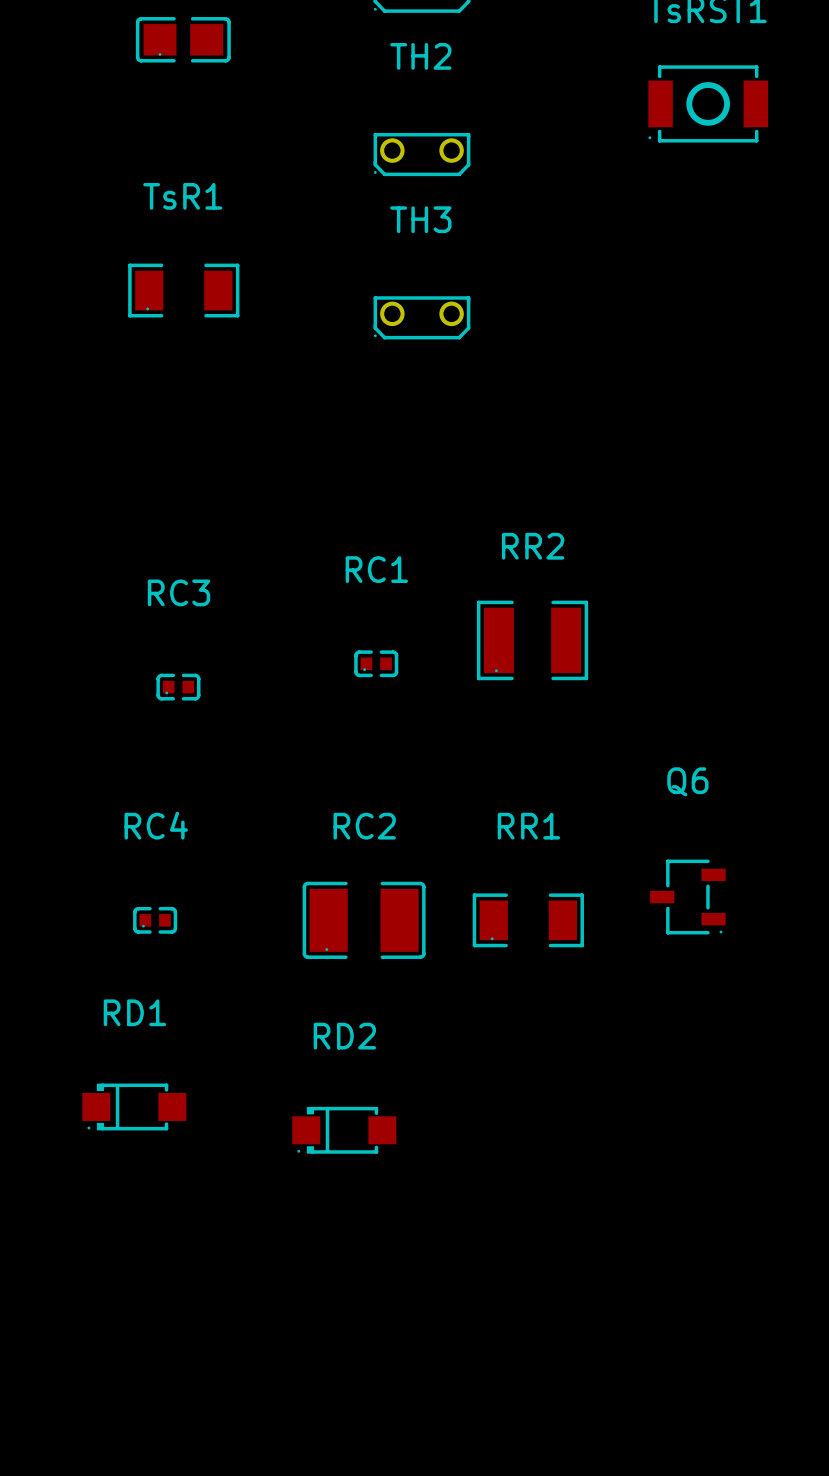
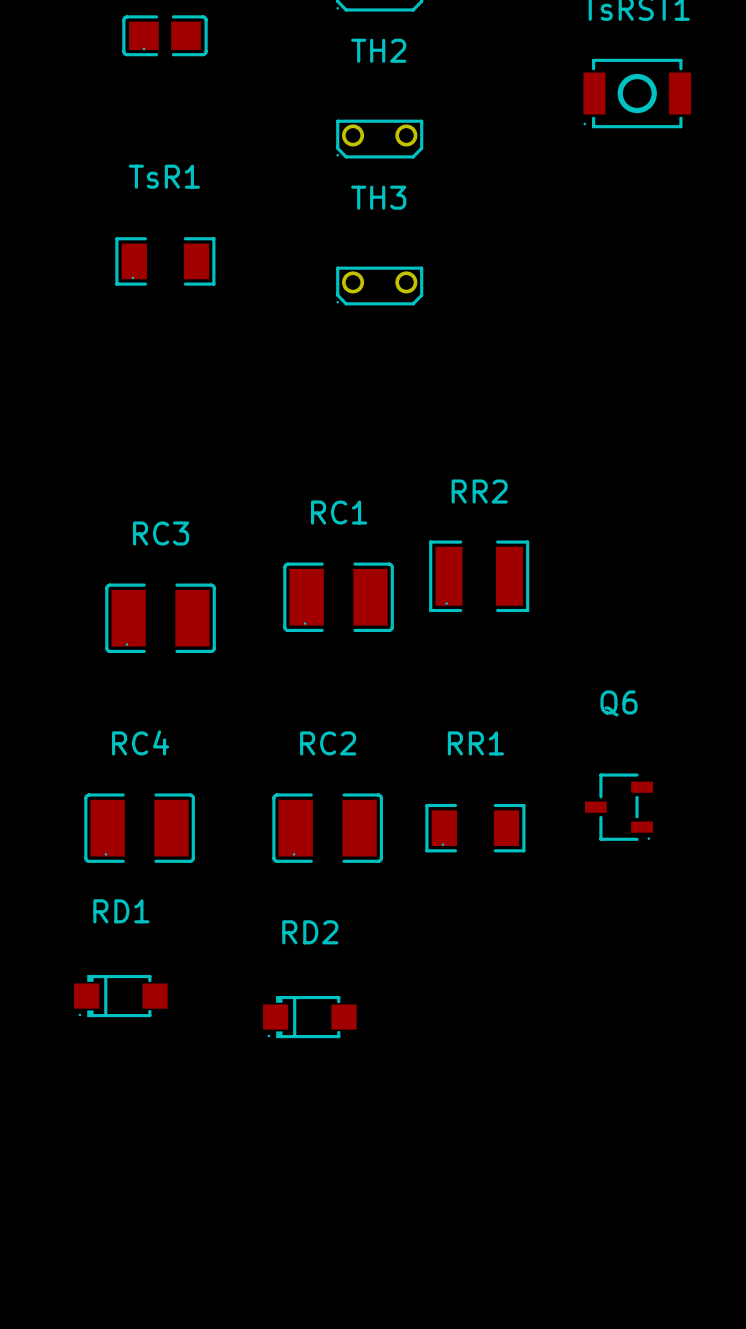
RC1 footprint: [354, 650, 399, 678] -> [283, 562, 394, 633]
RC3 footprint: [156, 673, 201, 701] -> [105, 583, 216, 653]
RC4 footprint: [133, 906, 178, 934] -> [84, 793, 195, 863]

